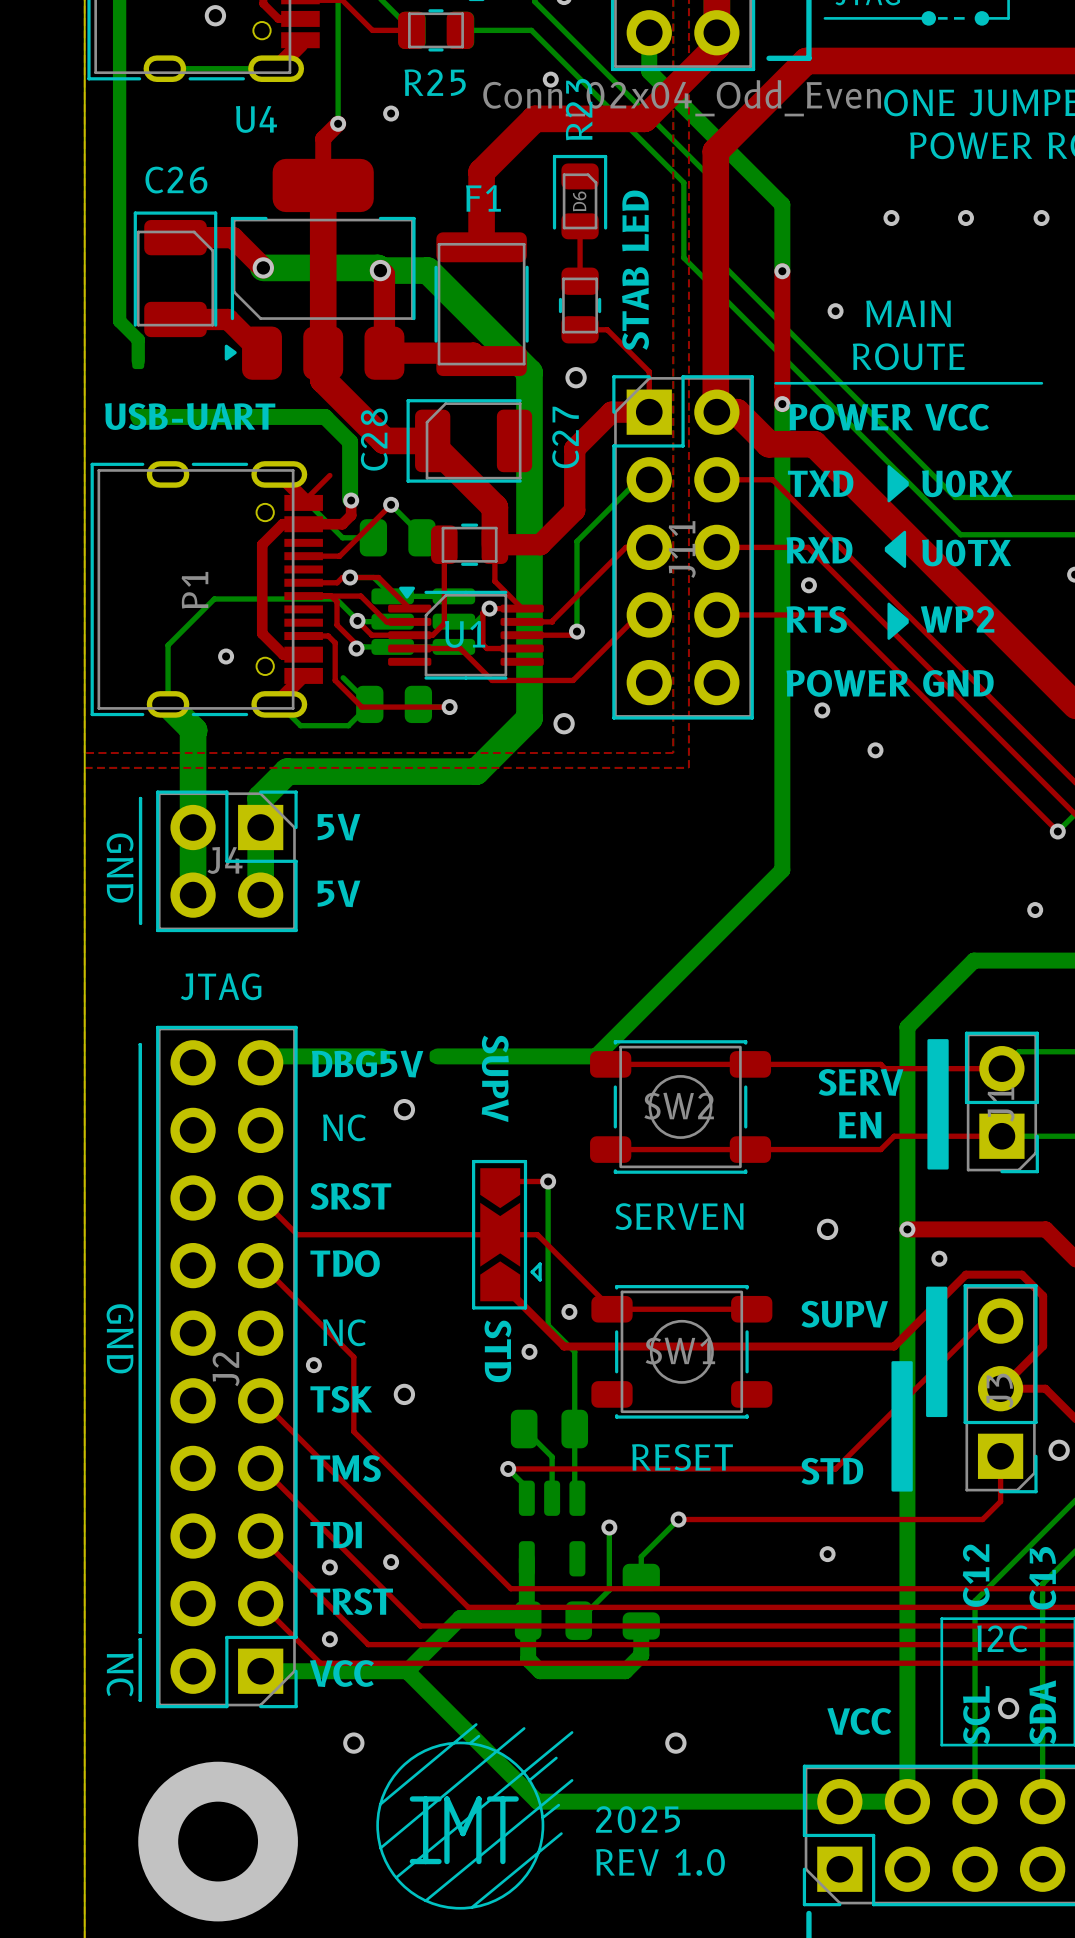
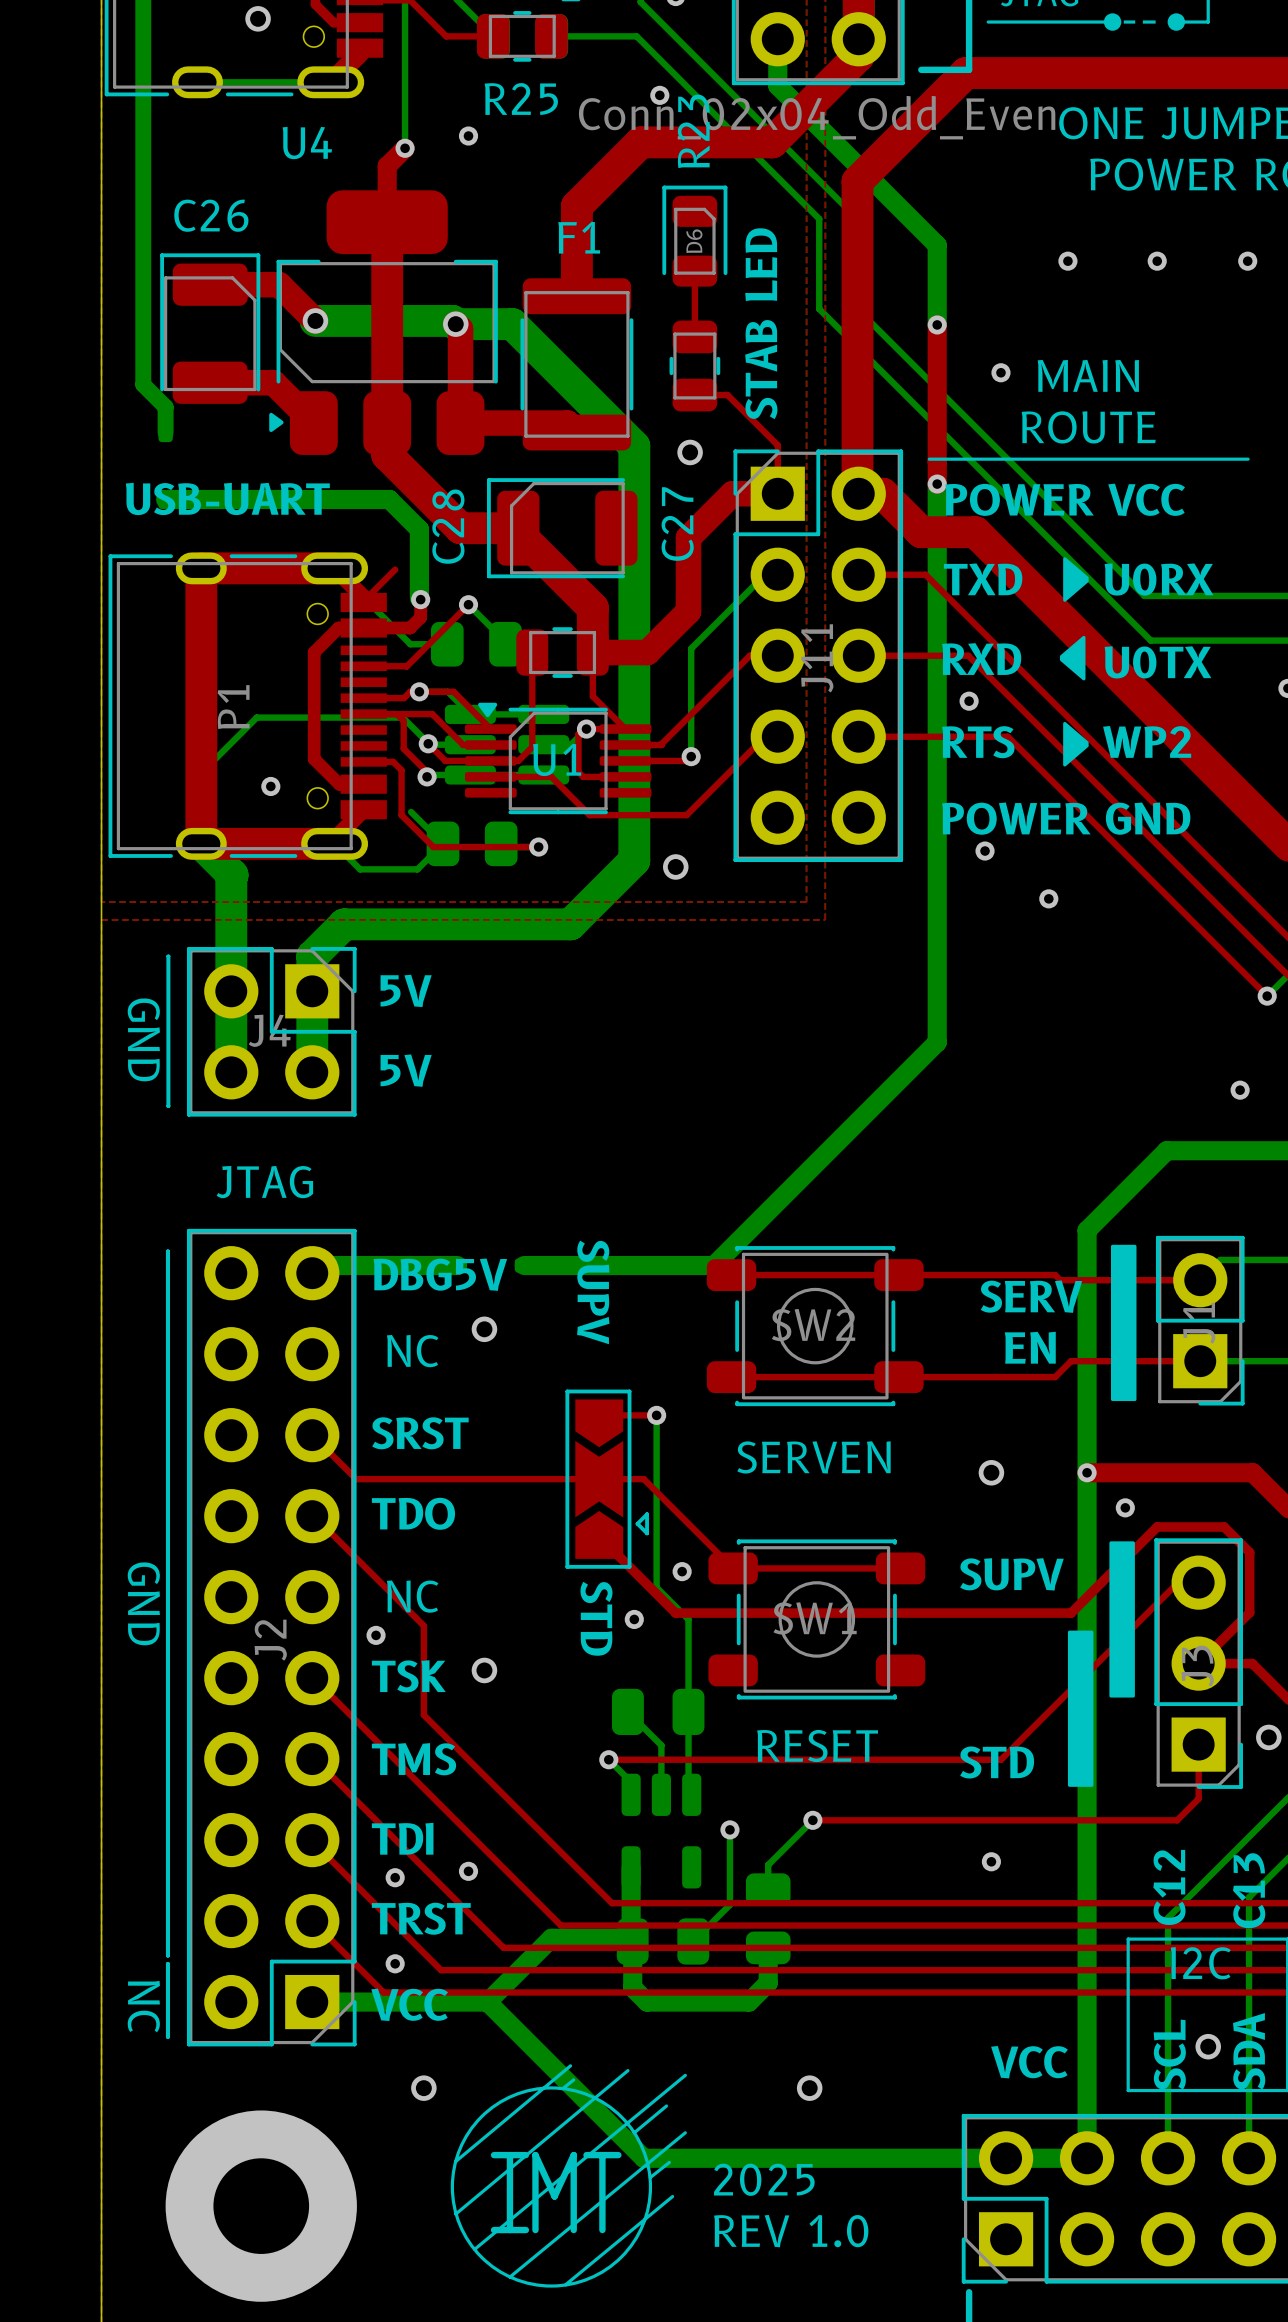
top track: none -> (334, 568) (201, 568) (201, 843) (334, 843)

